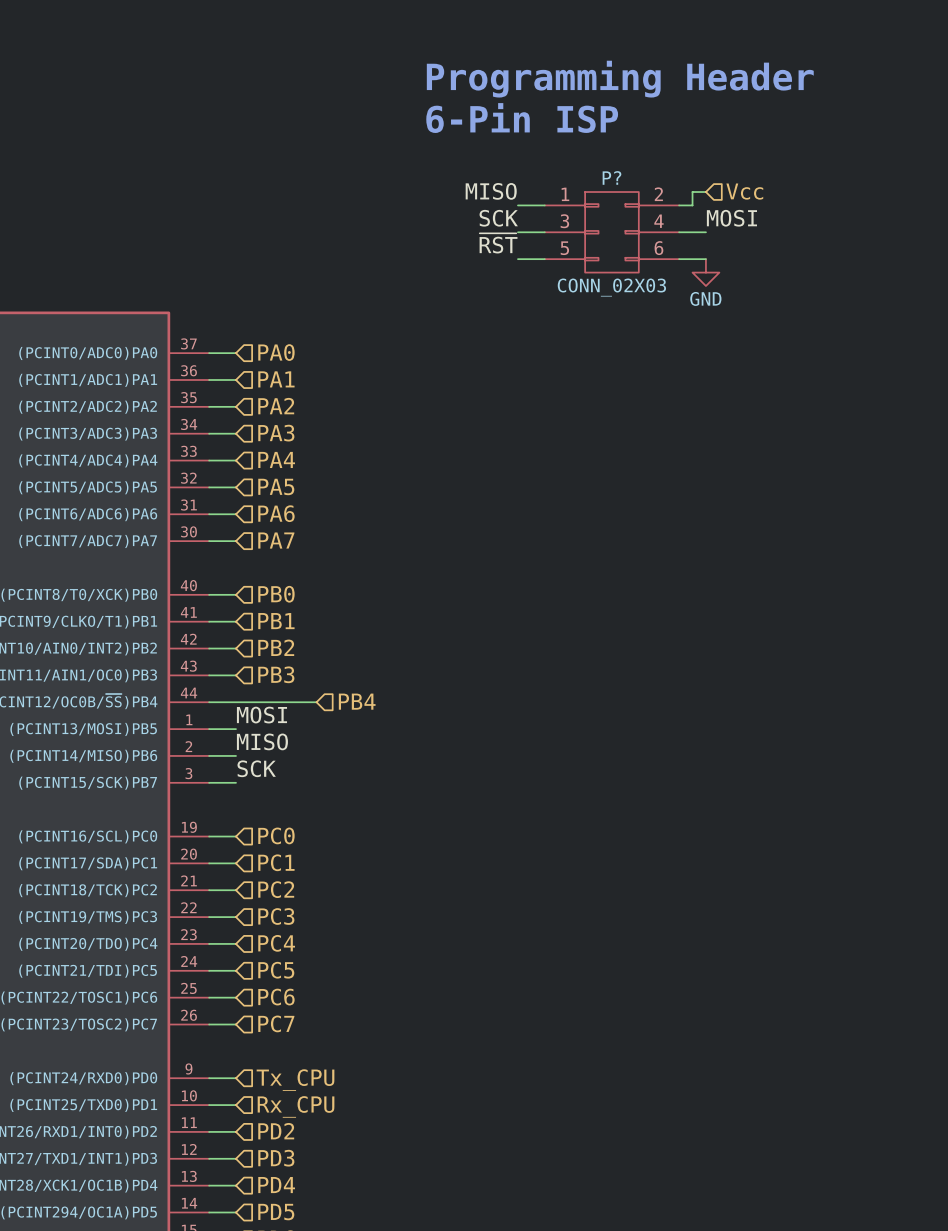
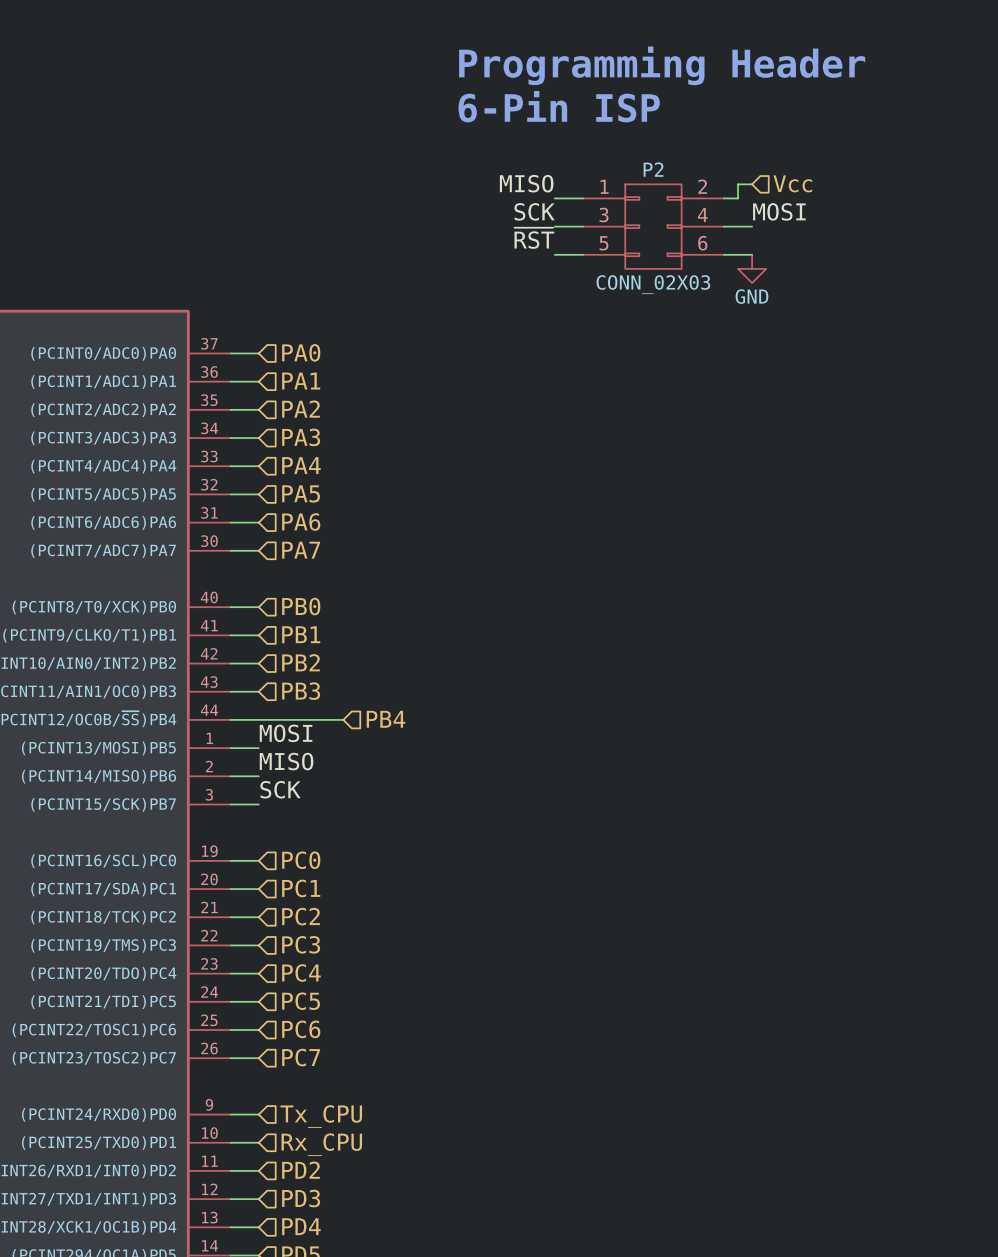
P? name: P? (611, 177) -> P2 (653, 169)

